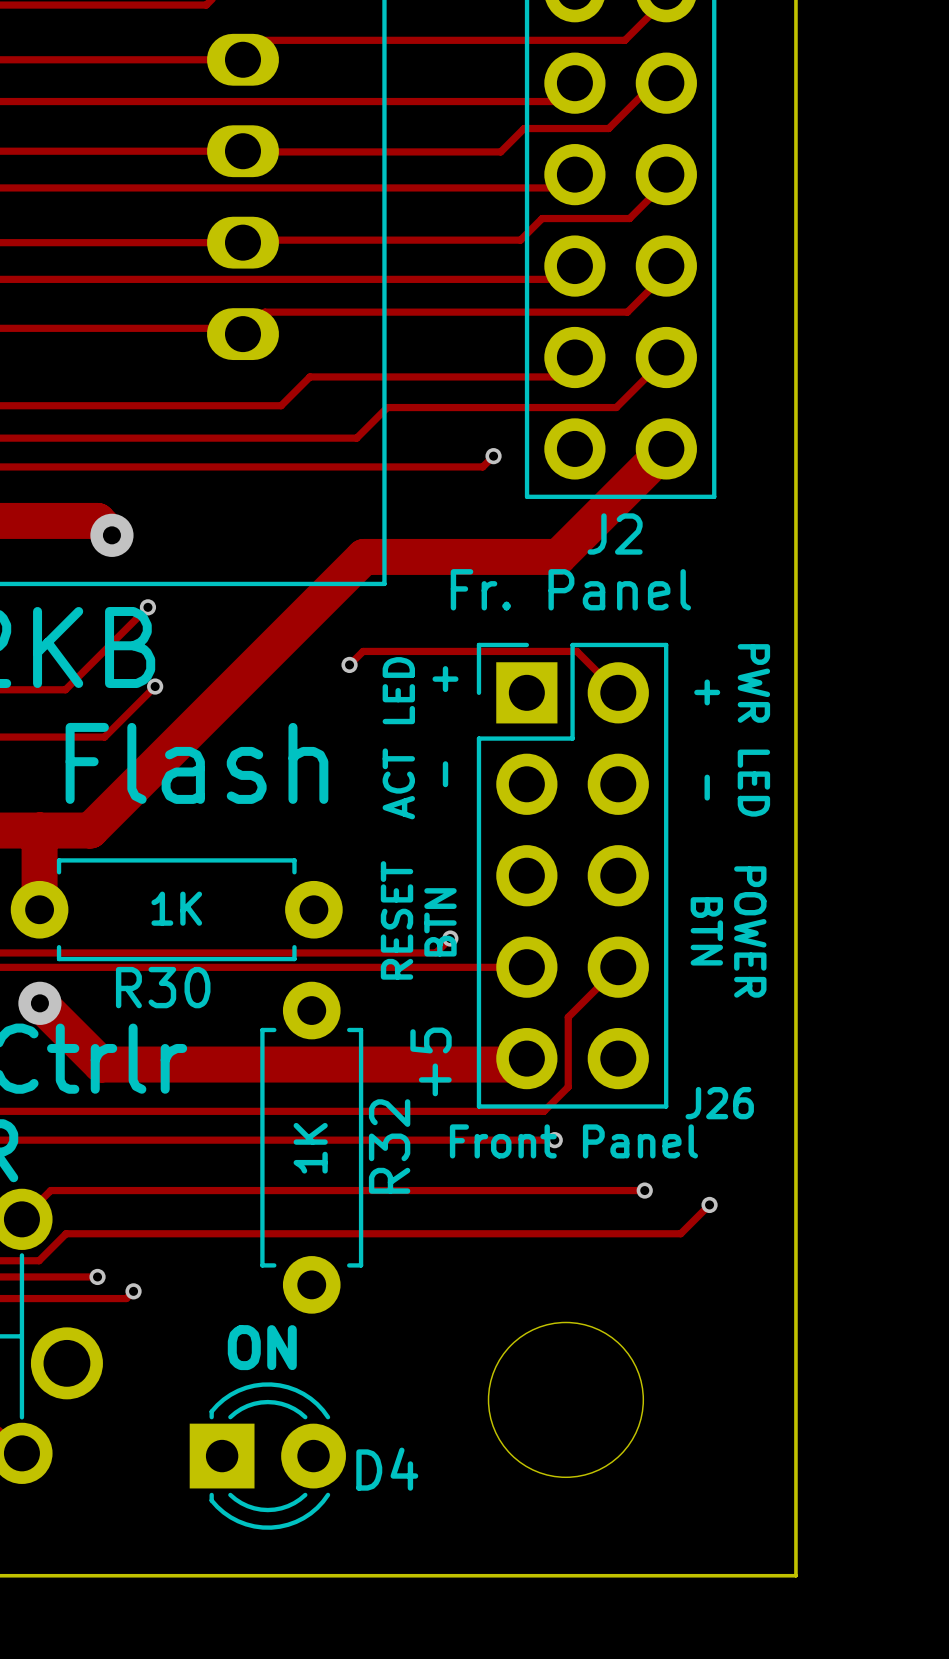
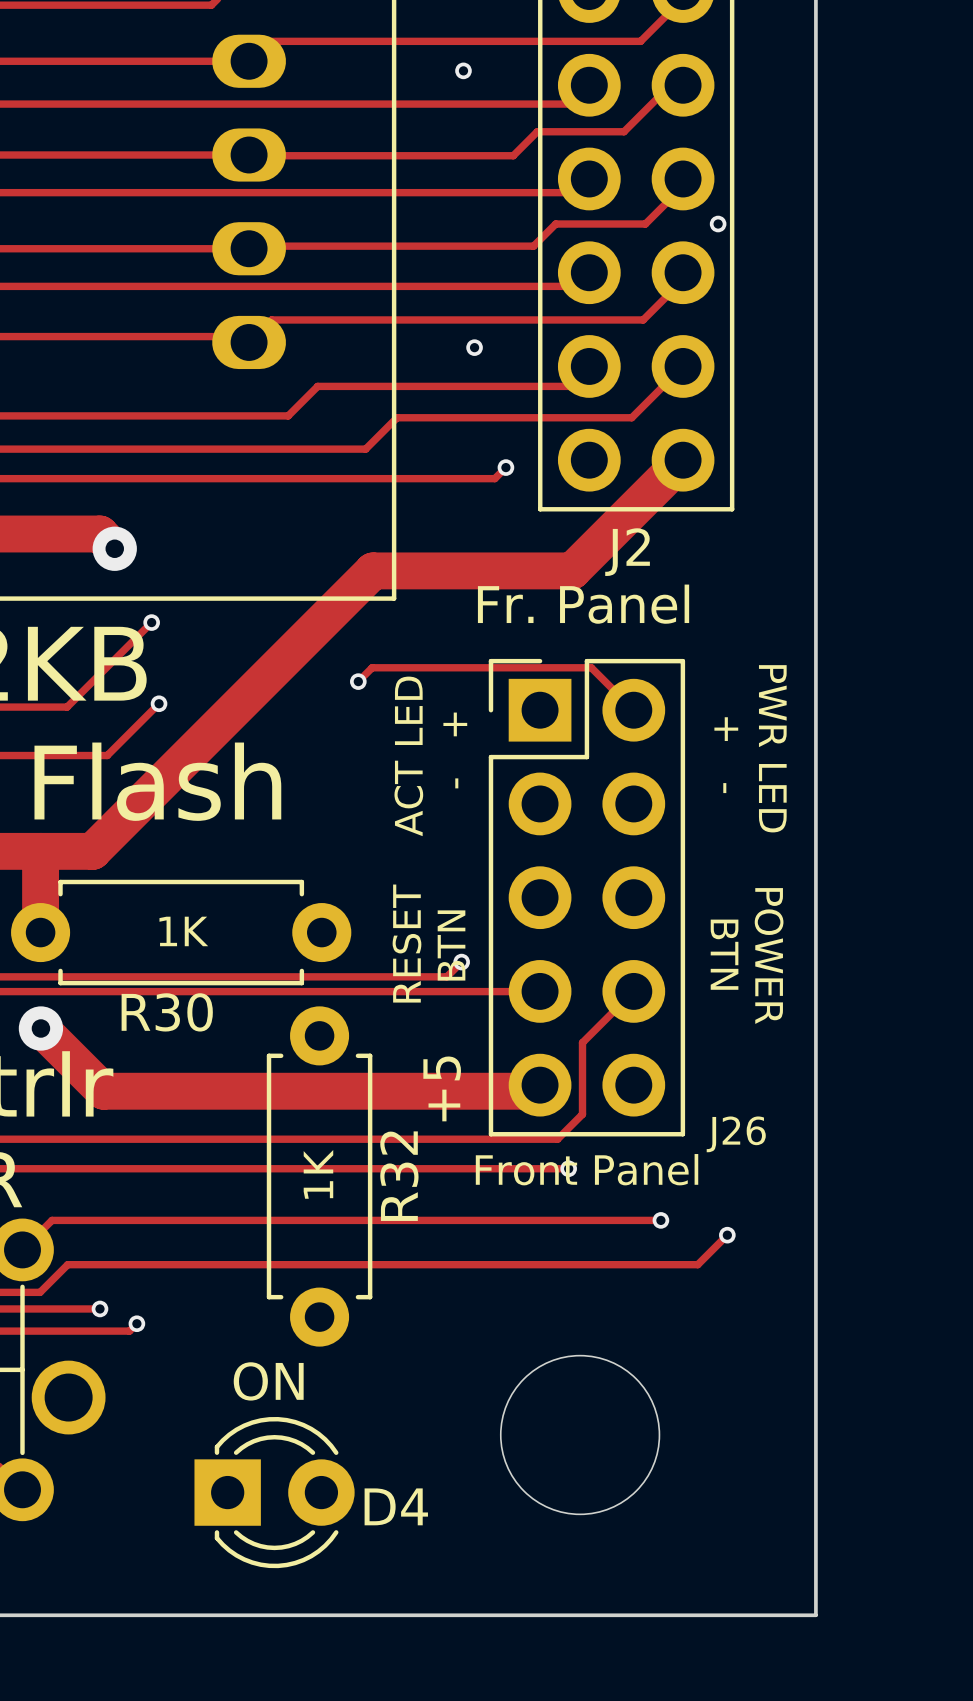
via: none -> (463, 70)
via: none -> (718, 224)
via: none -> (474, 347)

